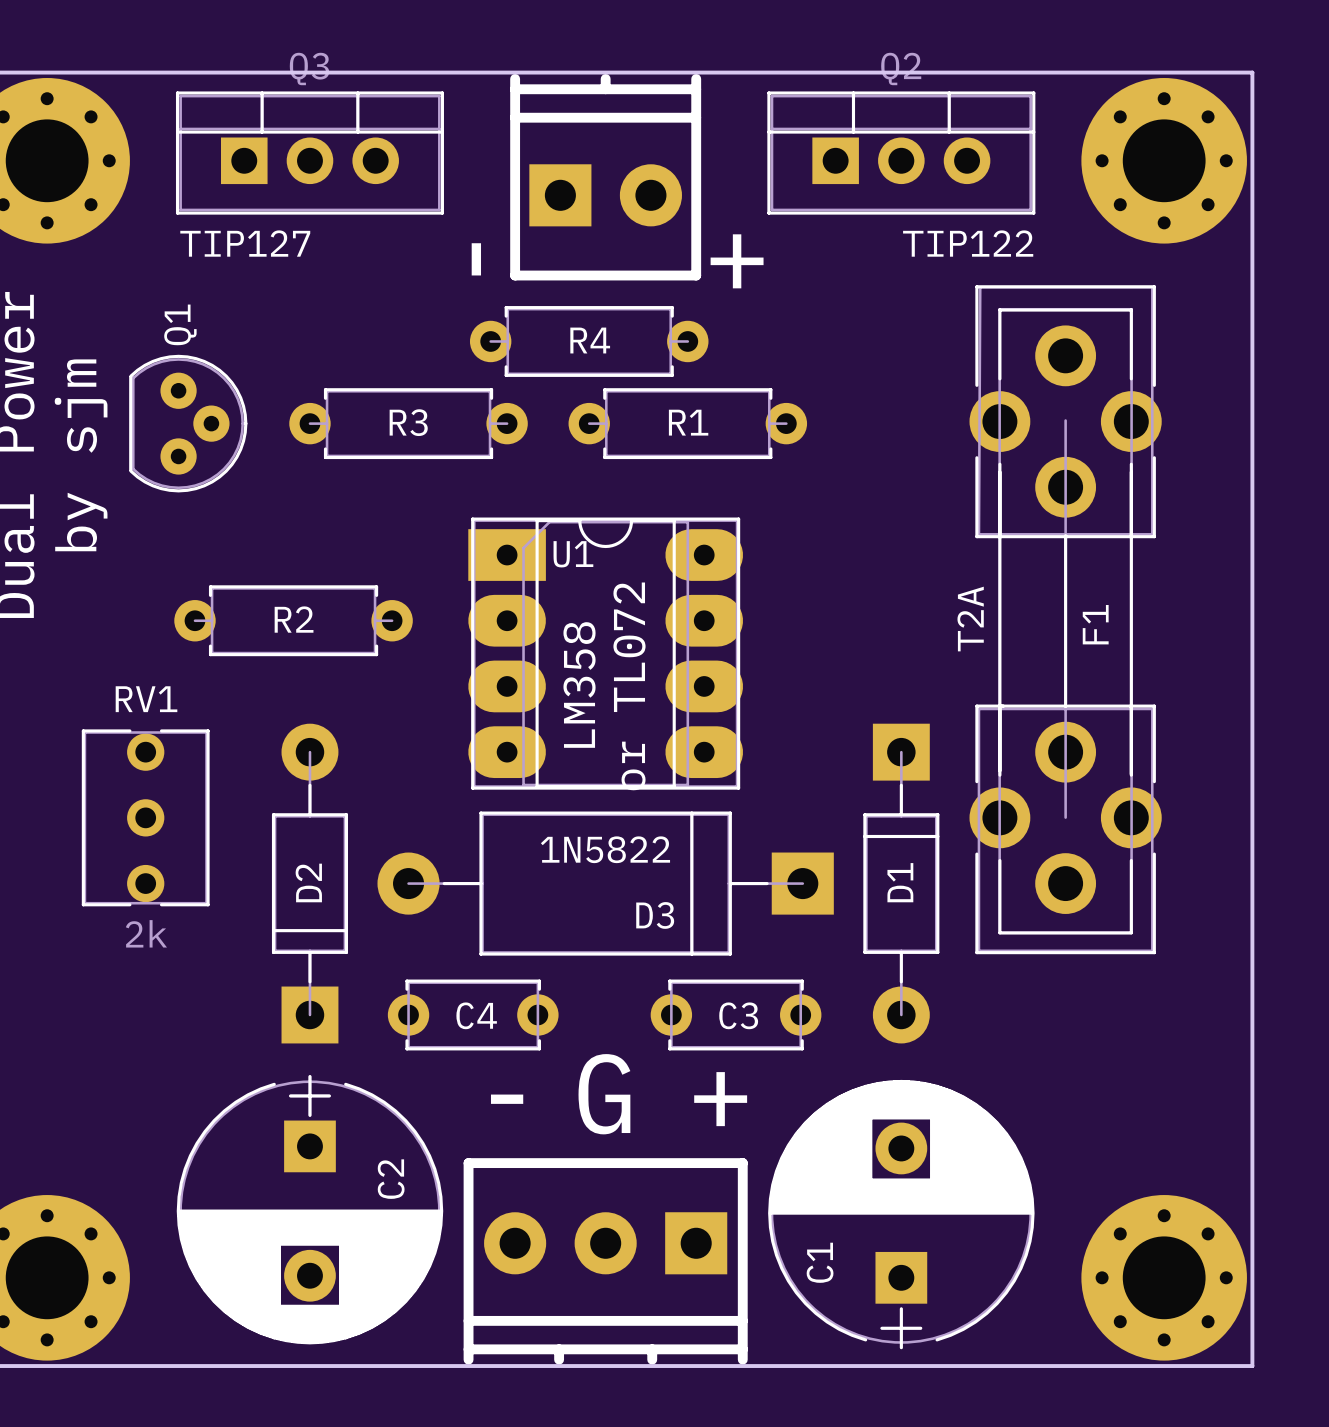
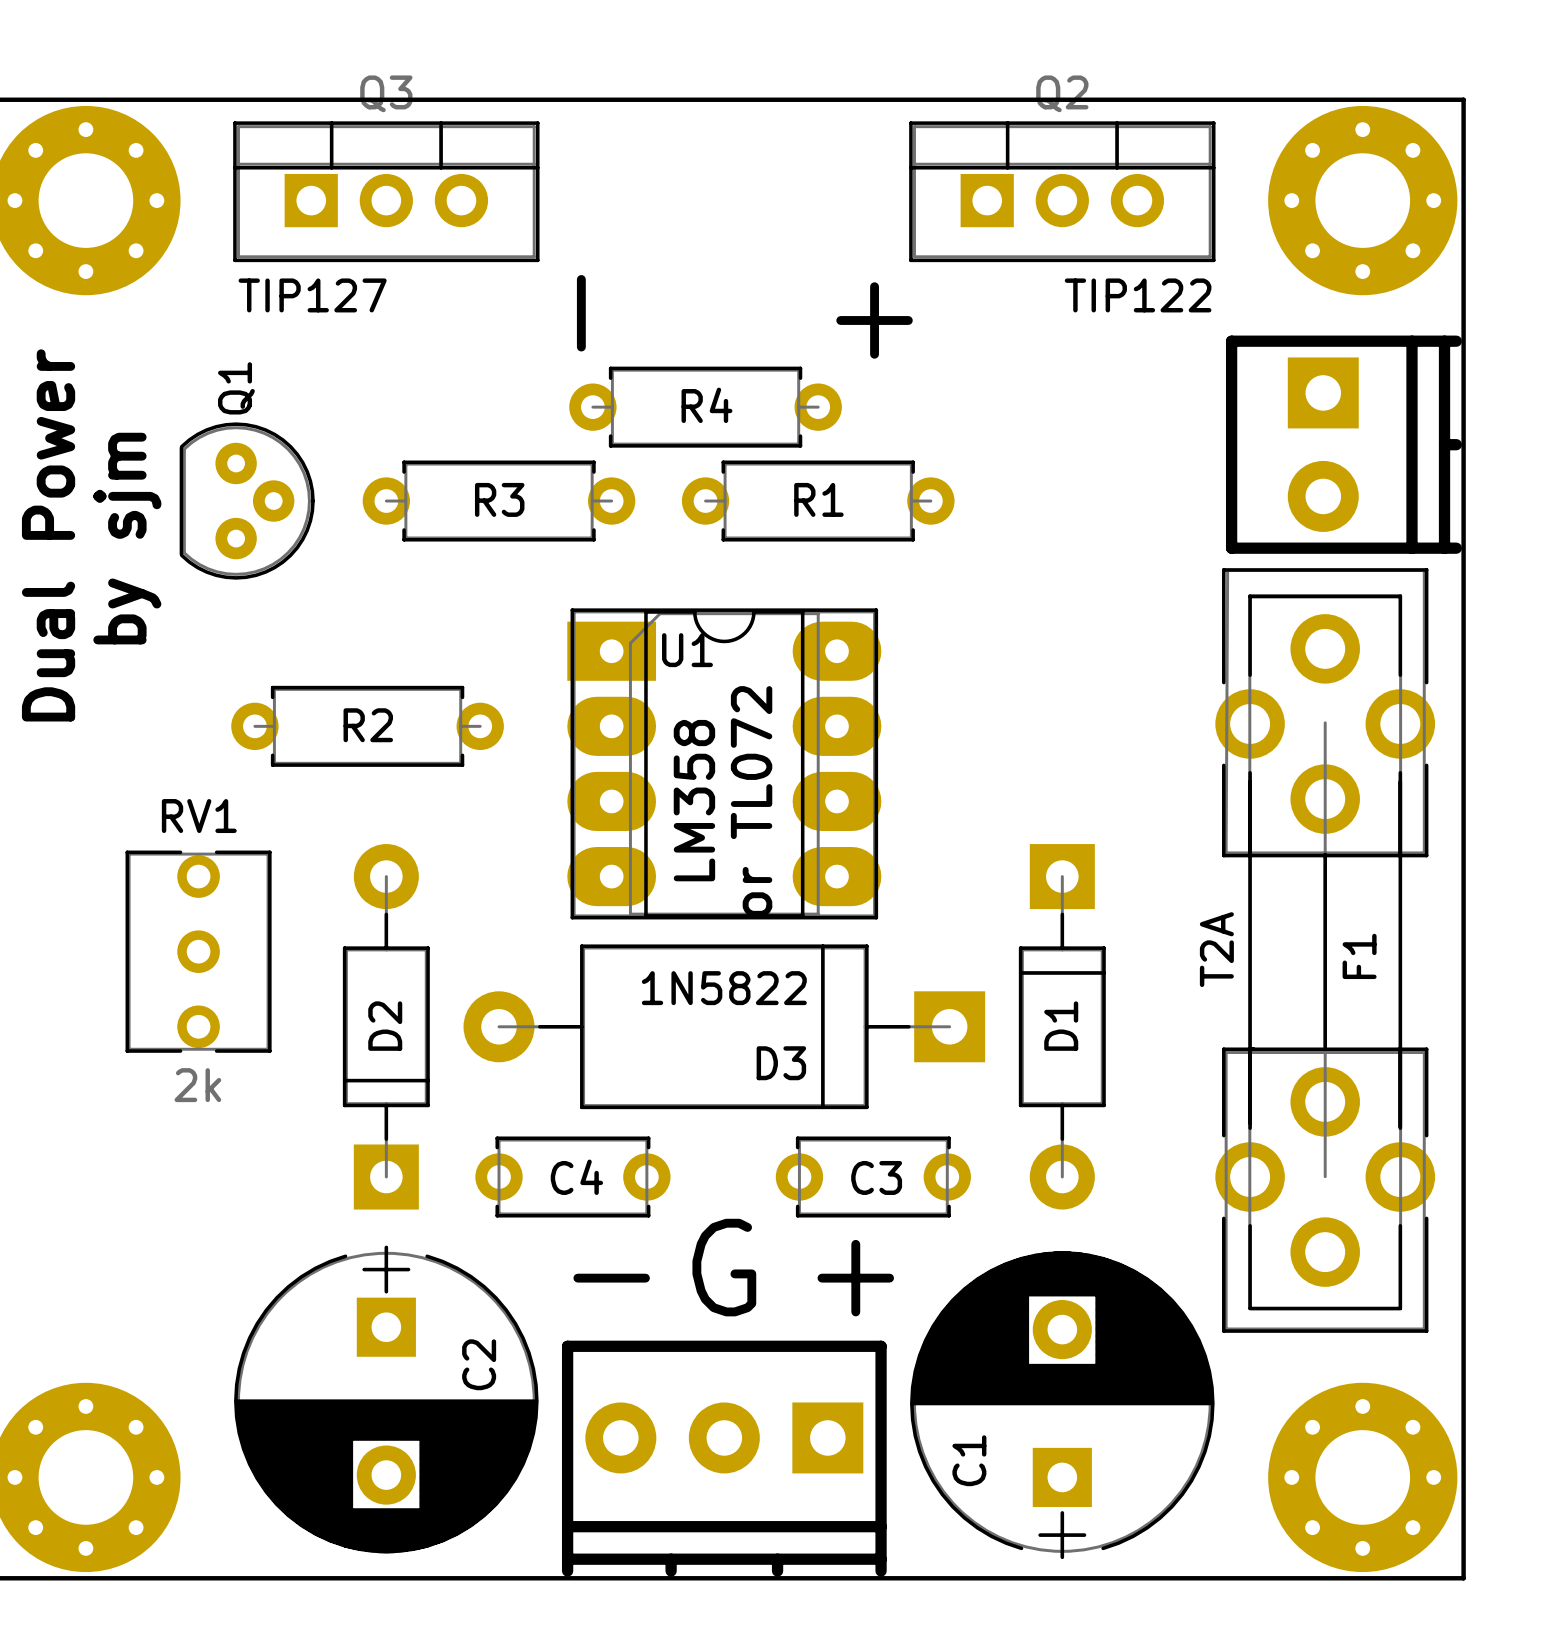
part rotation: 0° (605, 177) -> 90° clockwise (1343, 444)
part position: (605, 177) -> (1343, 444)
F1 position: (1065, 619) -> (1325, 950)

